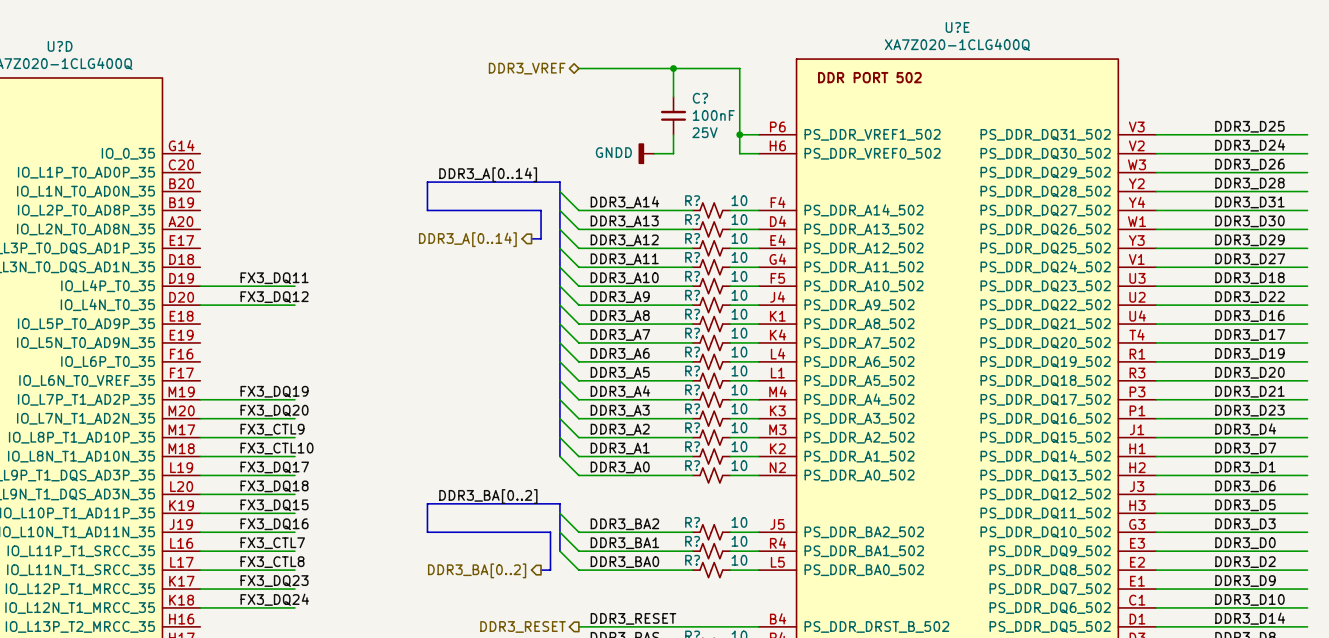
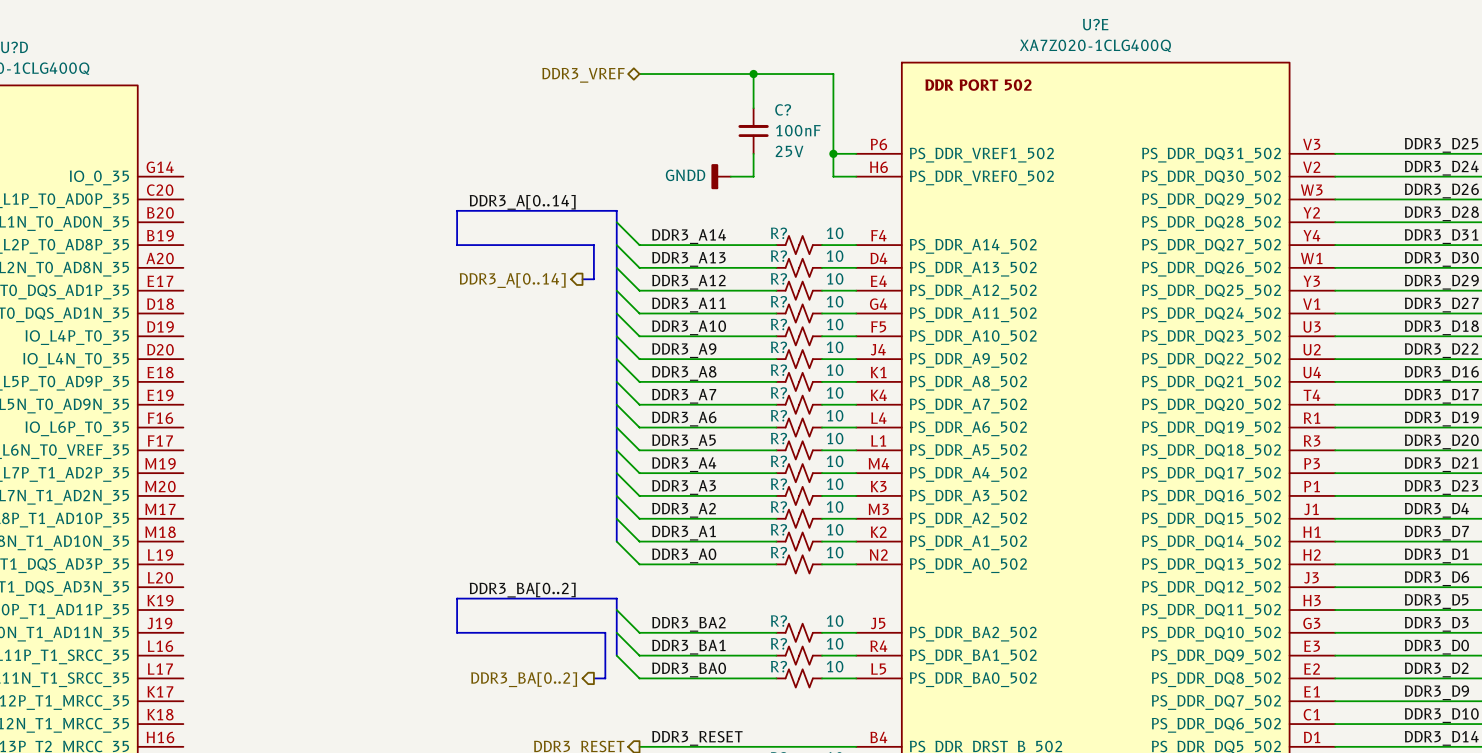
label: FX3_DQ11 (274, 278) -> none
wire: (200, 286) (294, 286) -> none
label: FX3_DQ12 (274, 297) -> none
wire: (200, 305) (294, 305) -> none
label: FX3_DQ19 (274, 391) -> none
wire: (200, 399) (294, 399) -> none
label: FX3_DQ20 (274, 410) -> none
wire: (200, 418) (294, 418) -> none
label: FX3_CTL9 (272, 429) -> none
wire: (200, 437) (294, 437) -> none
label: FX3_CTL10 (277, 448) -> none
wire: (200, 456) (294, 456) -> none
label: FX3_DQ17 (274, 467) -> none
wire: (200, 475) (294, 475) -> none
label: FX3_DQ18 (274, 486) -> none
wire: (200, 494) (294, 494) -> none
label: FX3_DQ15 (274, 505) -> none
wire: (200, 513) (294, 513) -> none
label: FX3_DQ16 (274, 524) -> none
wire: (200, 532) (294, 532) -> none
label: FX3_CTL7 (272, 543) -> none
wire: (200, 551) (294, 551) -> none
label: FX3_CTL8 (272, 562) -> none
wire: (200, 570) (294, 570) -> none
label: FX3_DQ23 (274, 581) -> none
wire: (200, 589) (294, 589) -> none
label: FX3_DQ24 (274, 599) -> none
wire: (200, 607) (294, 607) -> none

